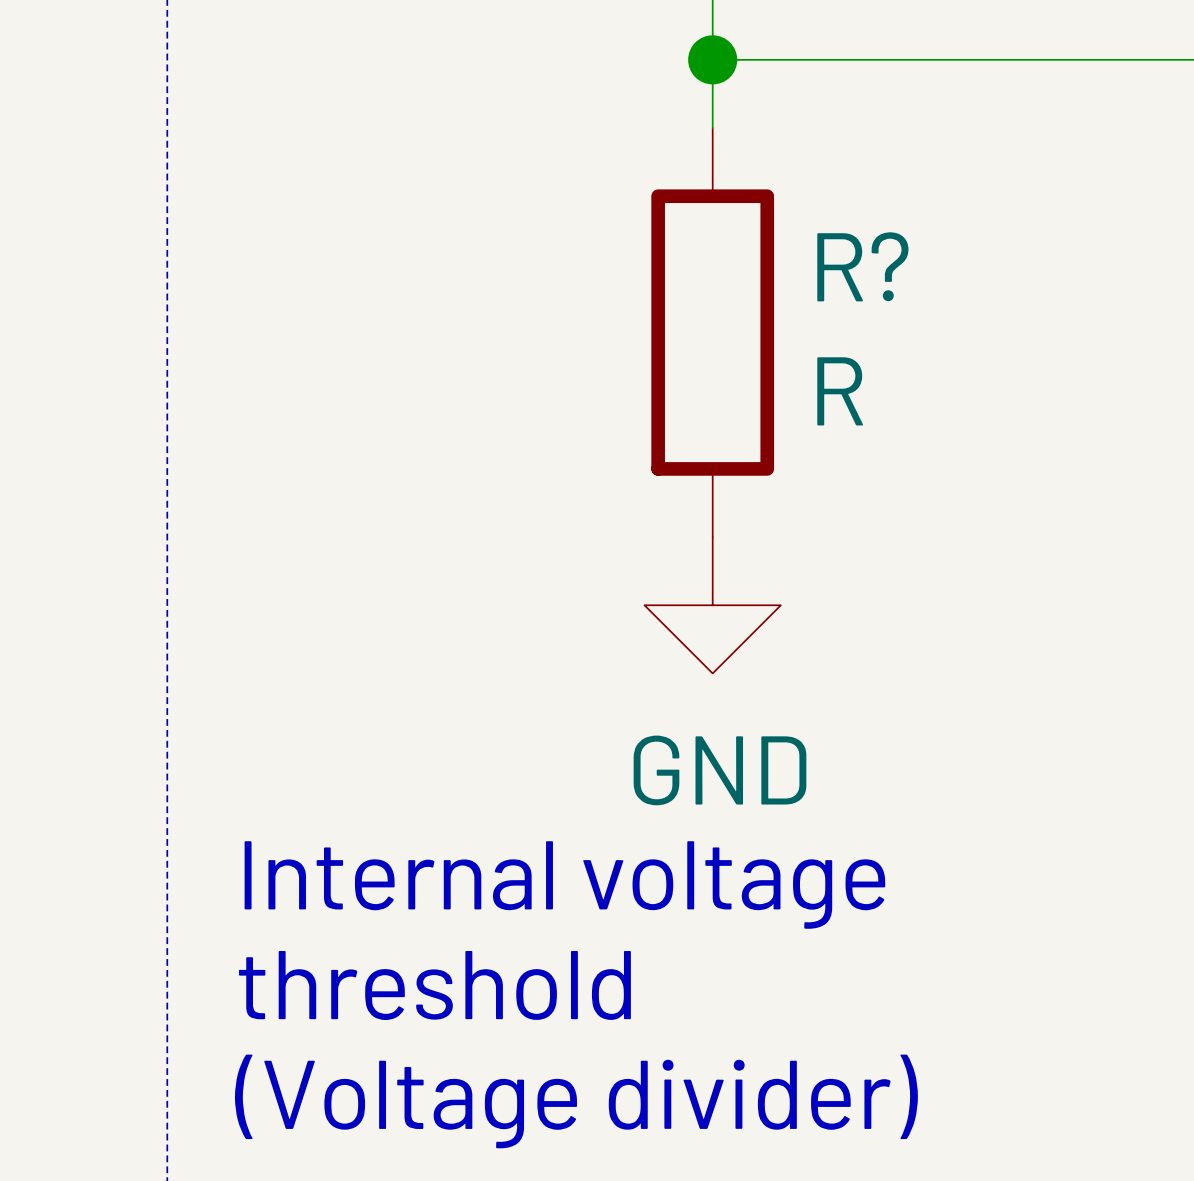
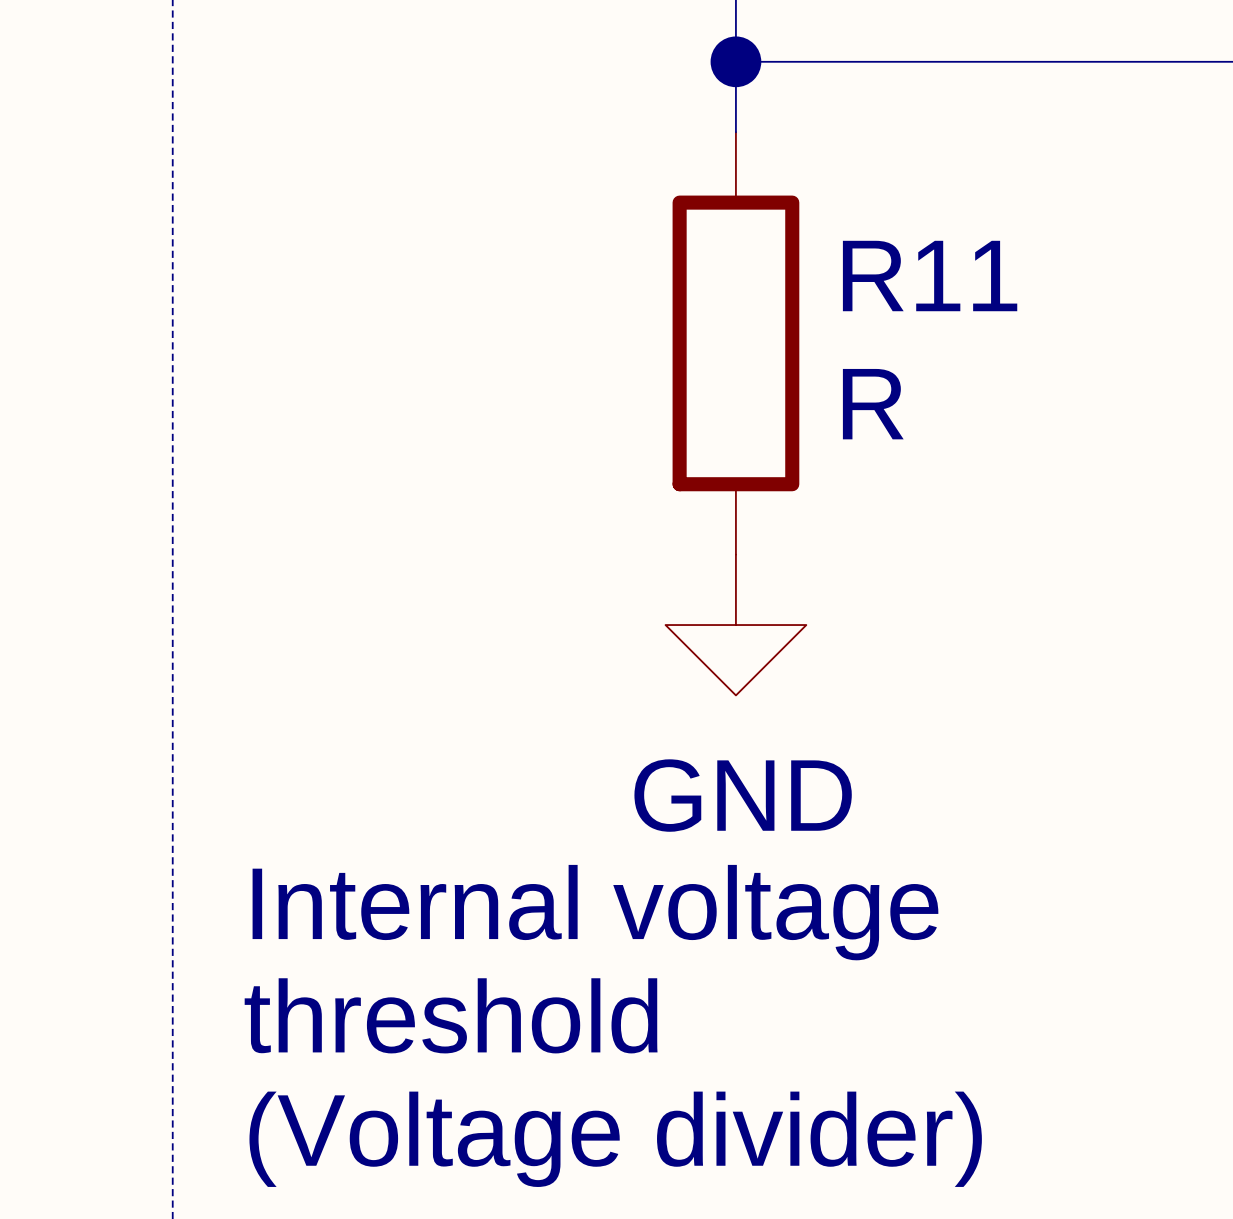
R? name: R? (862, 266) -> R11 (930, 276)

